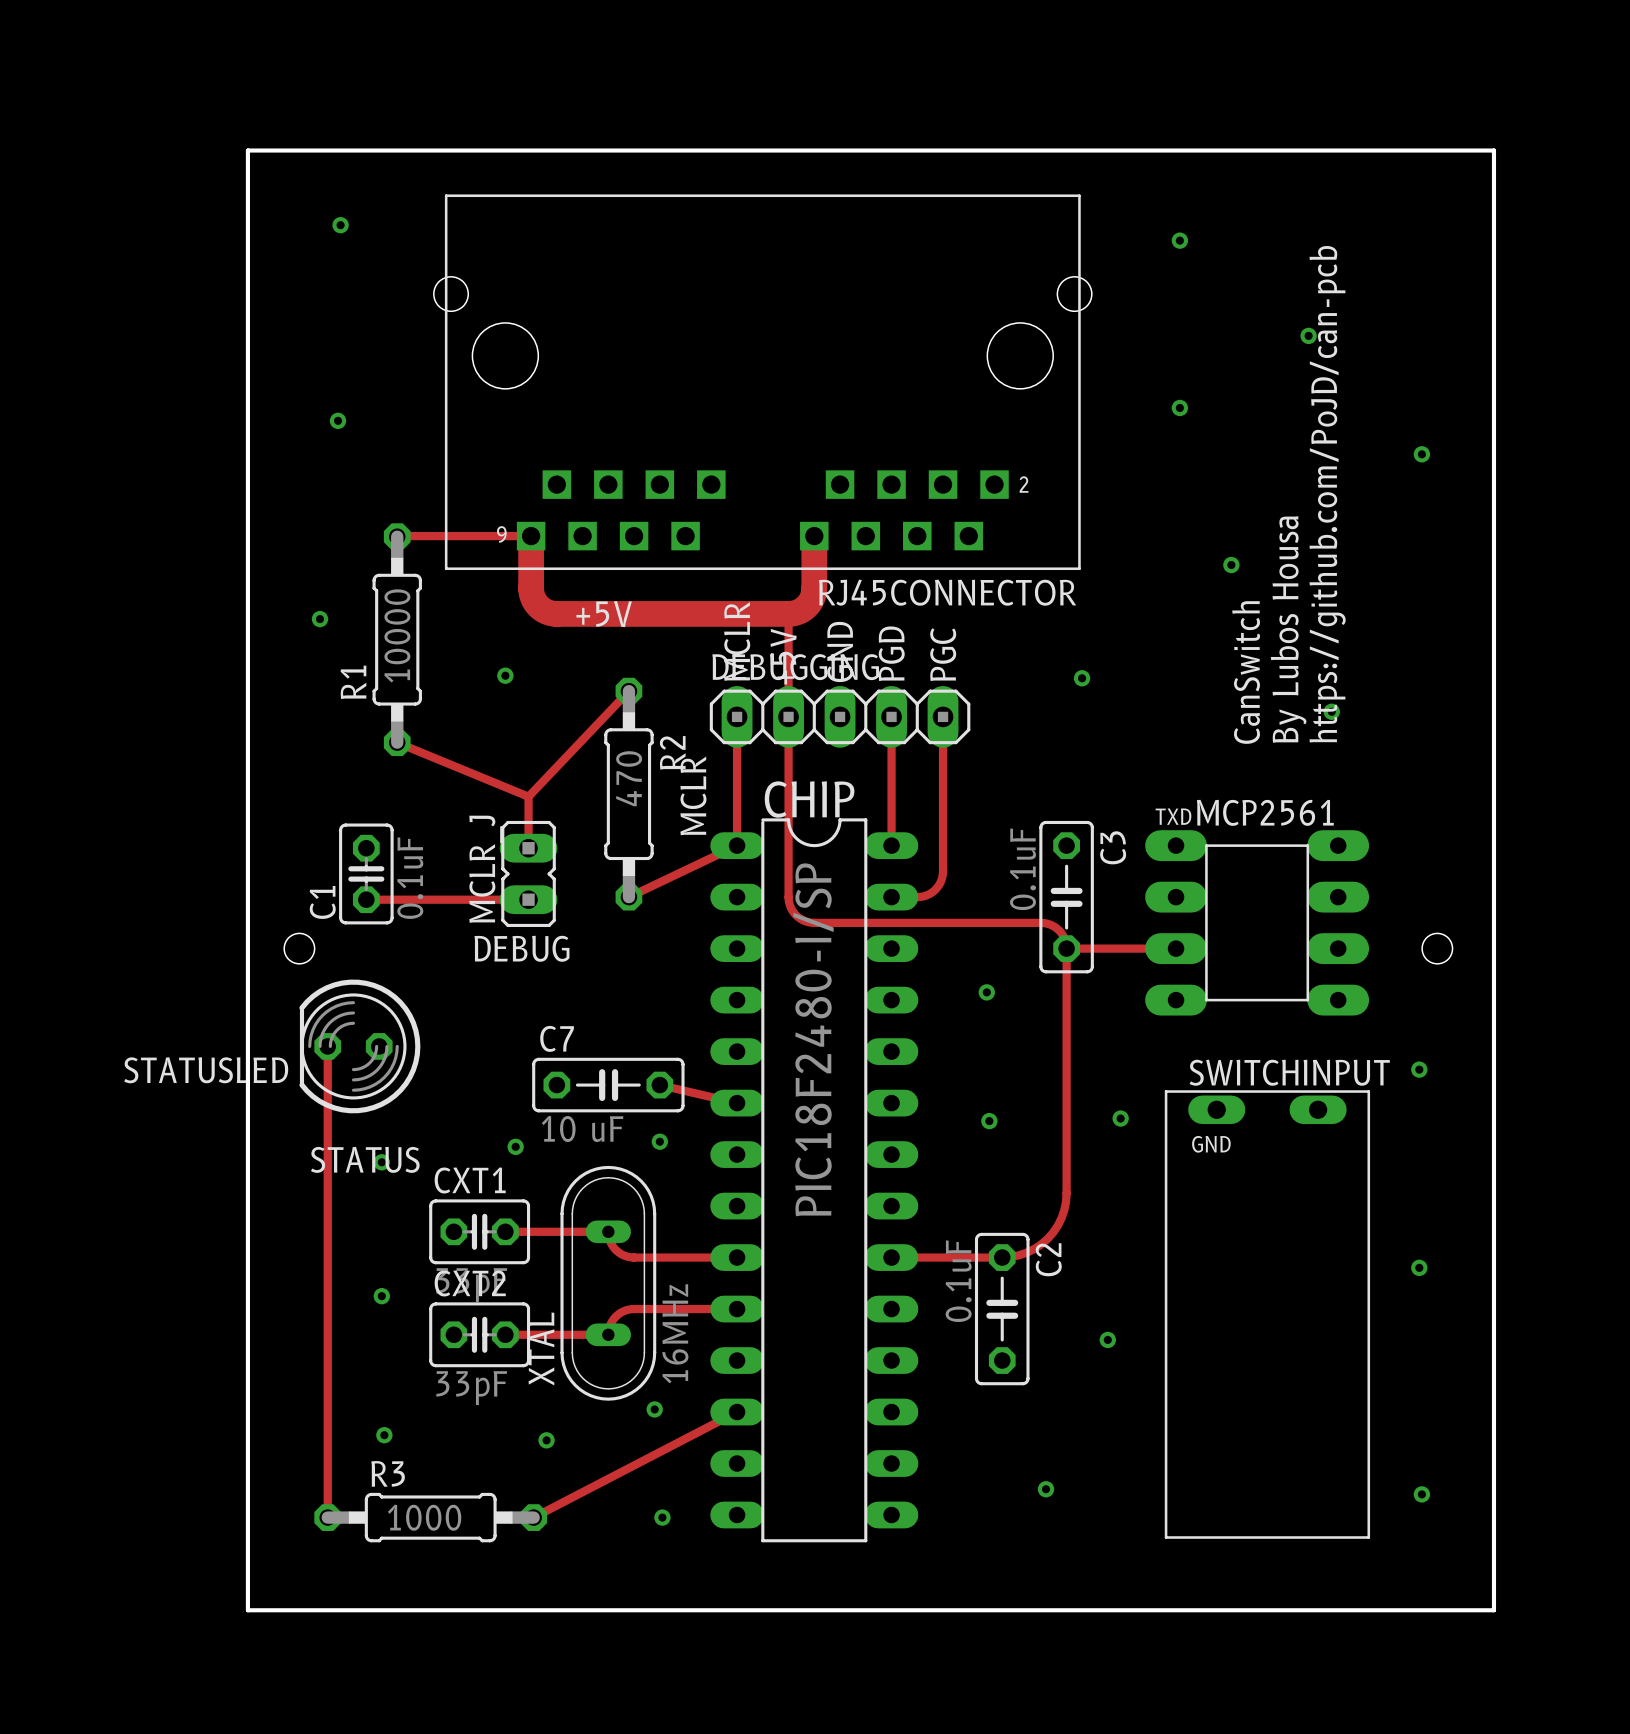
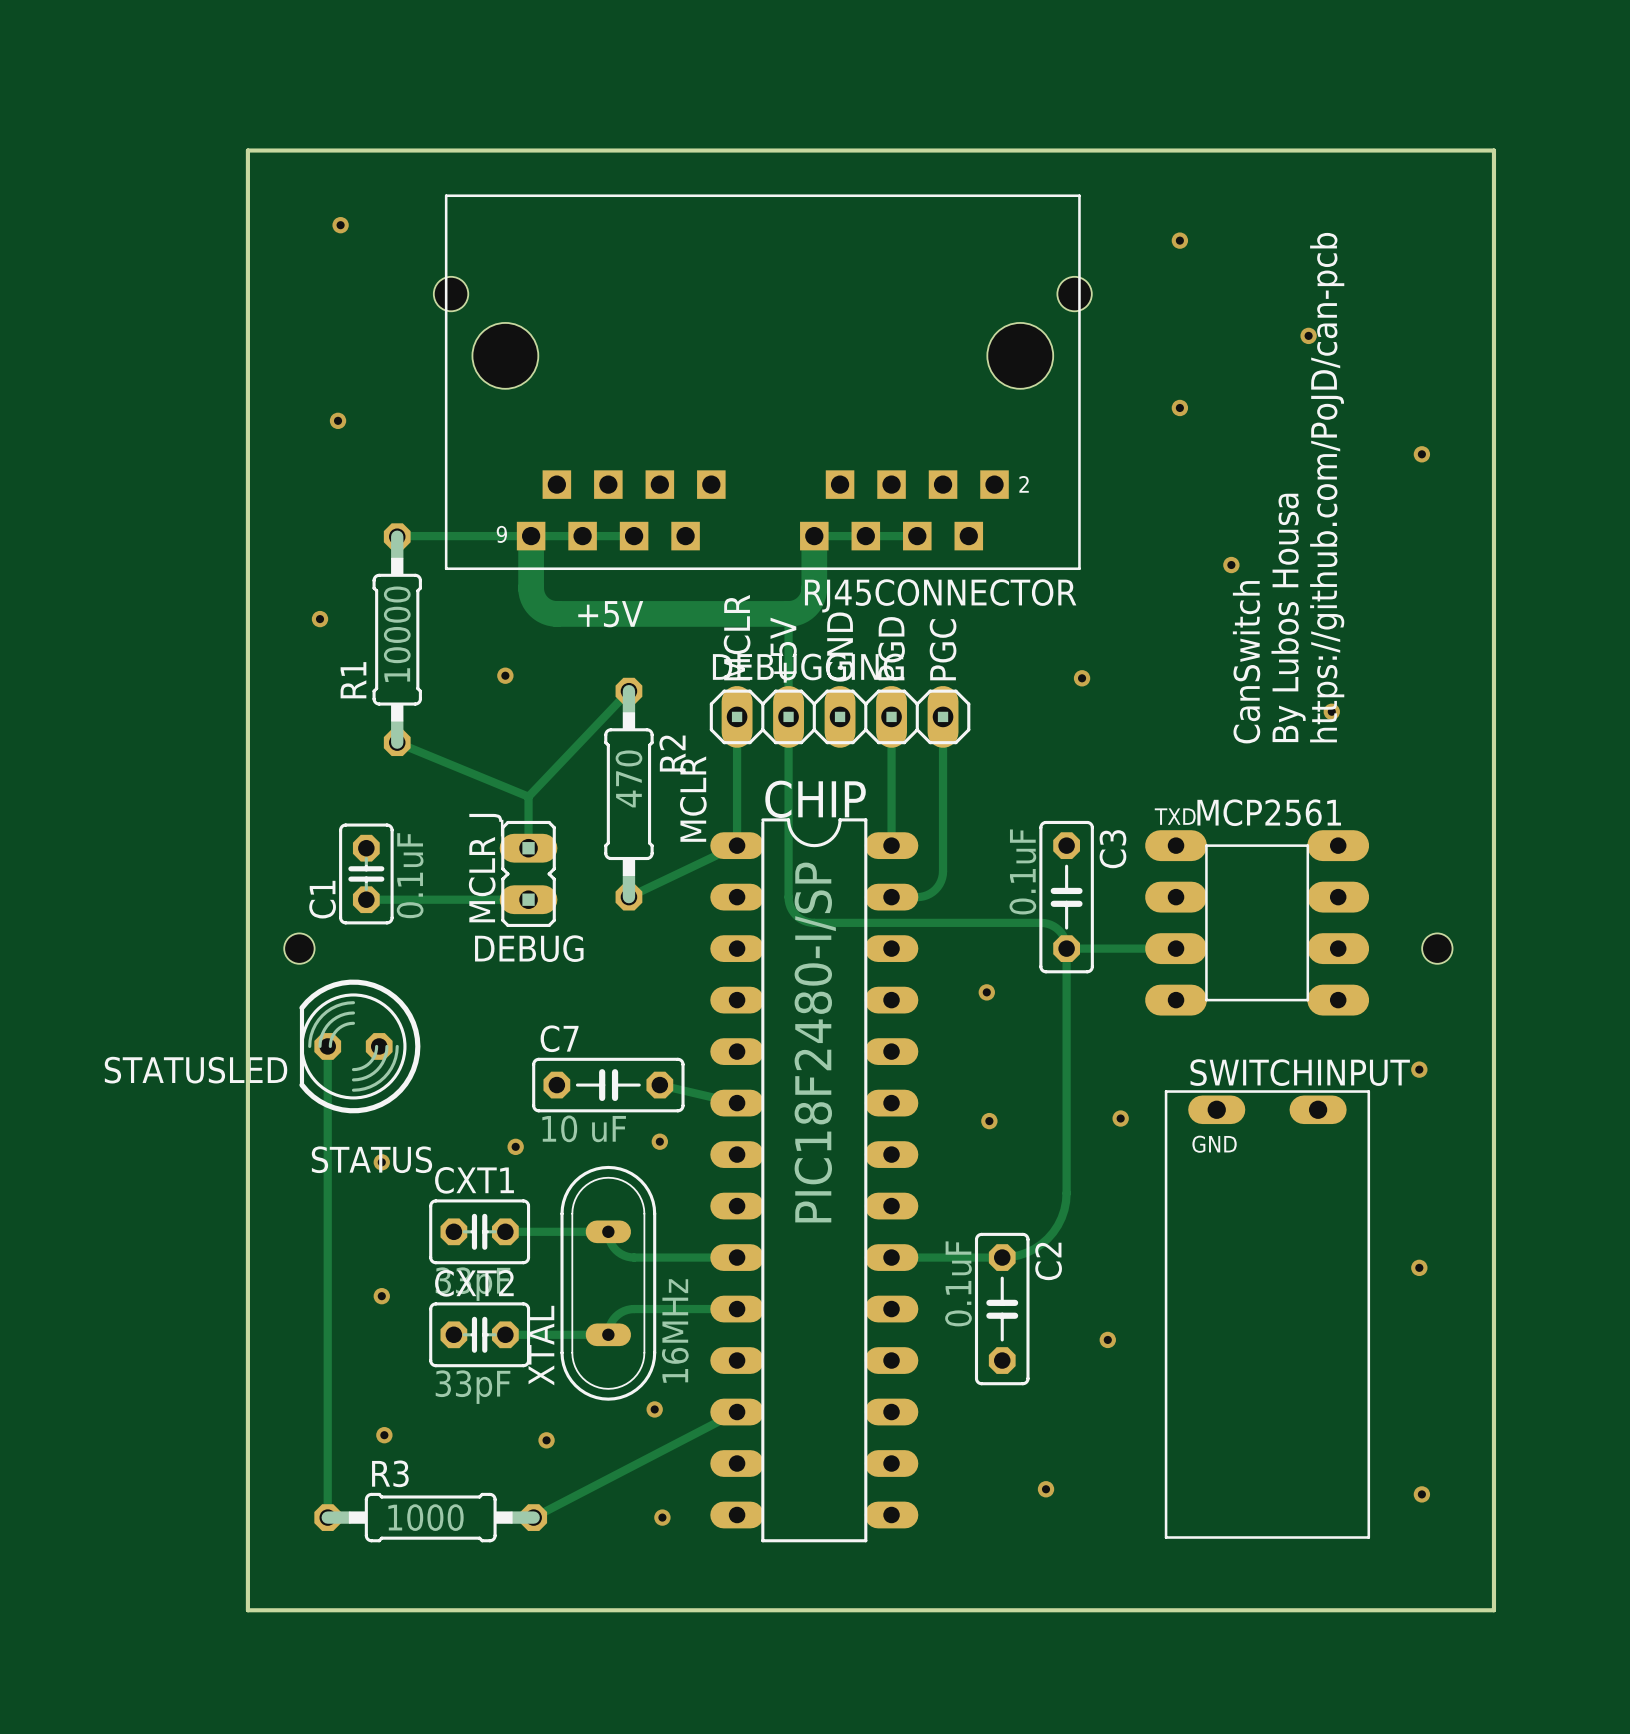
track: none -> (531, 536) (634, 536)
track: none -> (814, 536) (917, 536)

